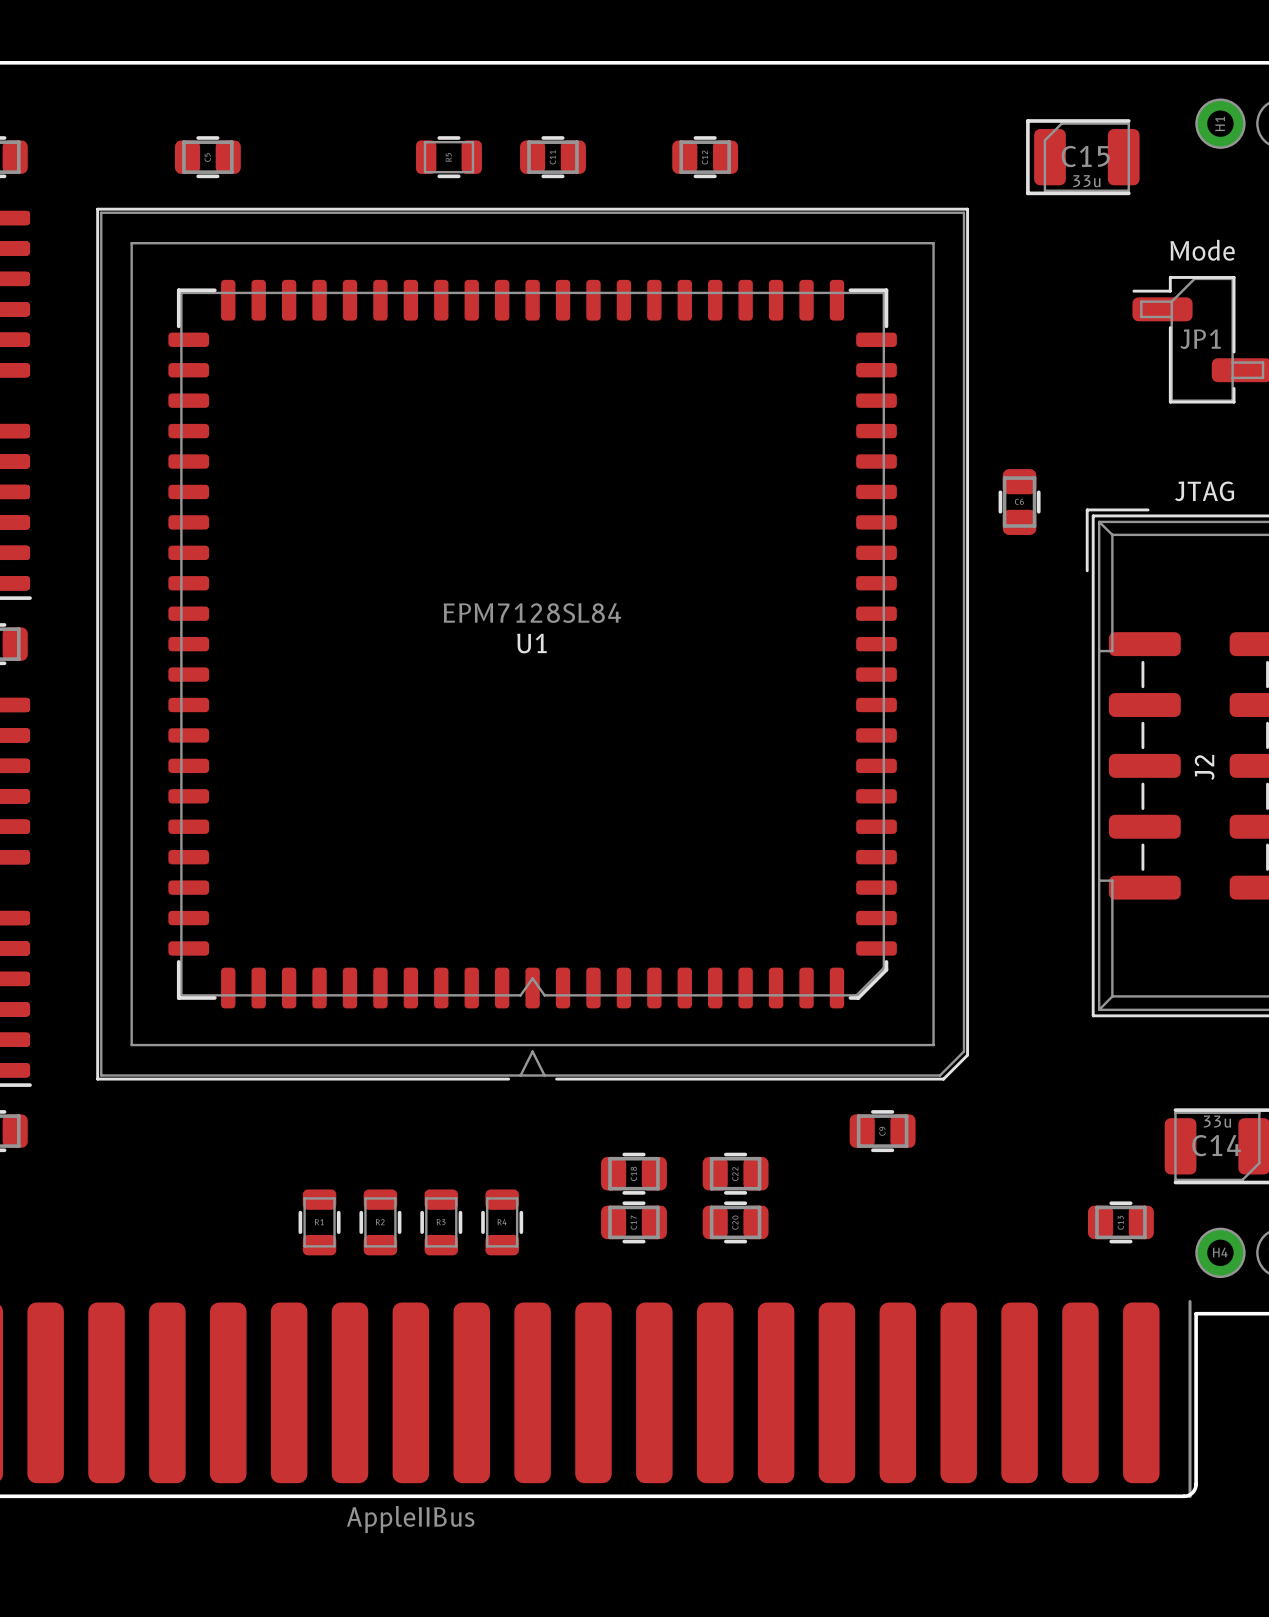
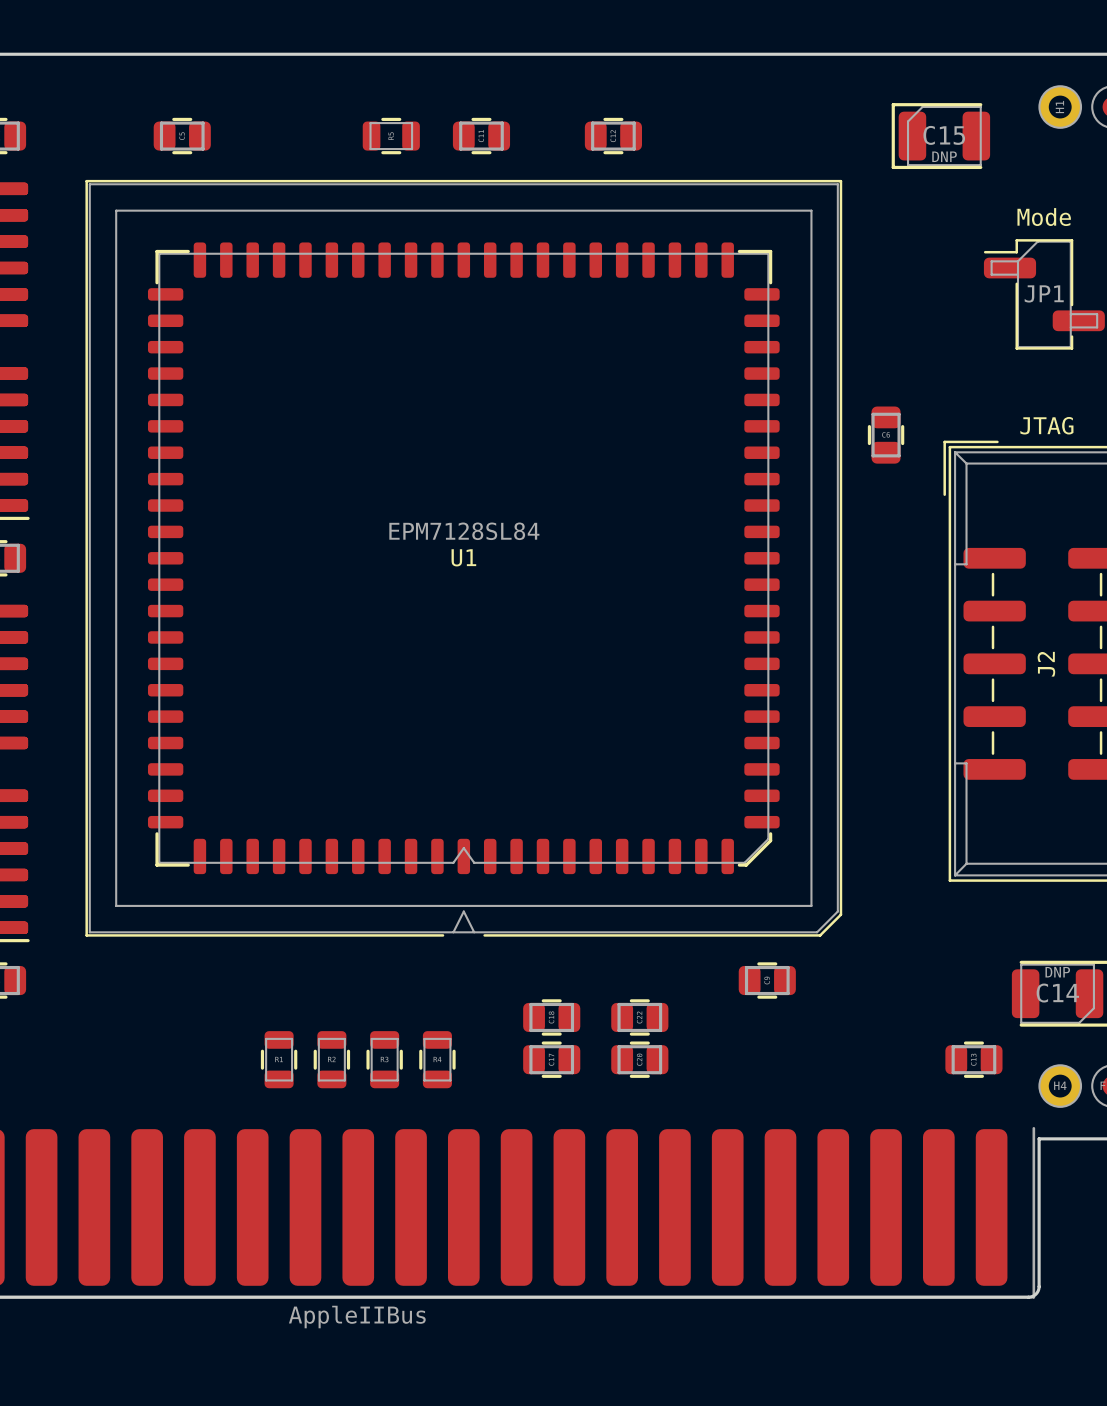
C15 value: 33u (1086, 181) -> DNP (944, 156)
C14 value: 33u (1217, 1121) -> DNP (1057, 972)

